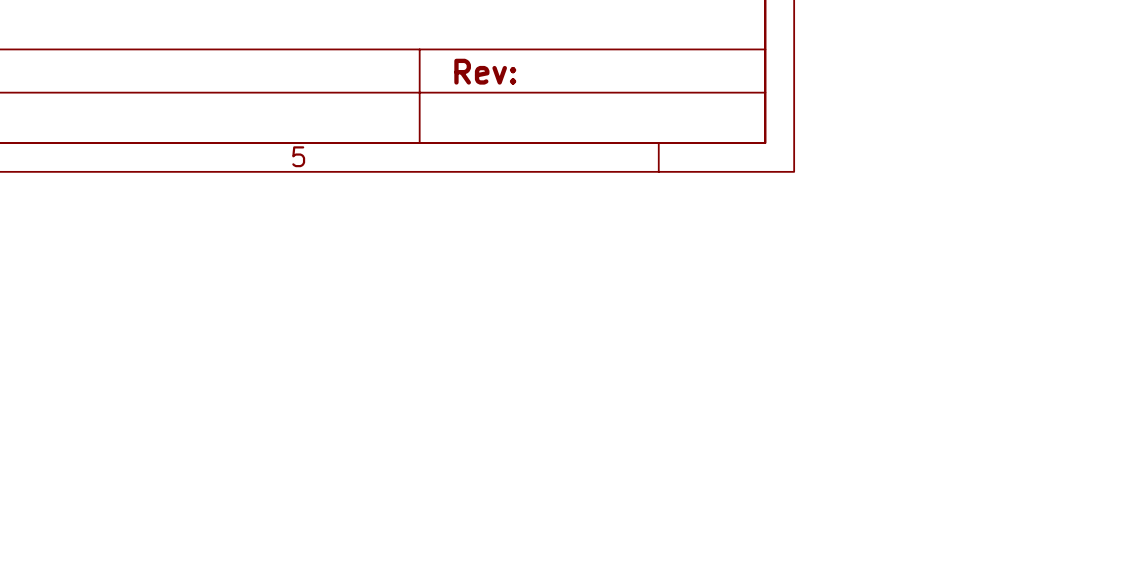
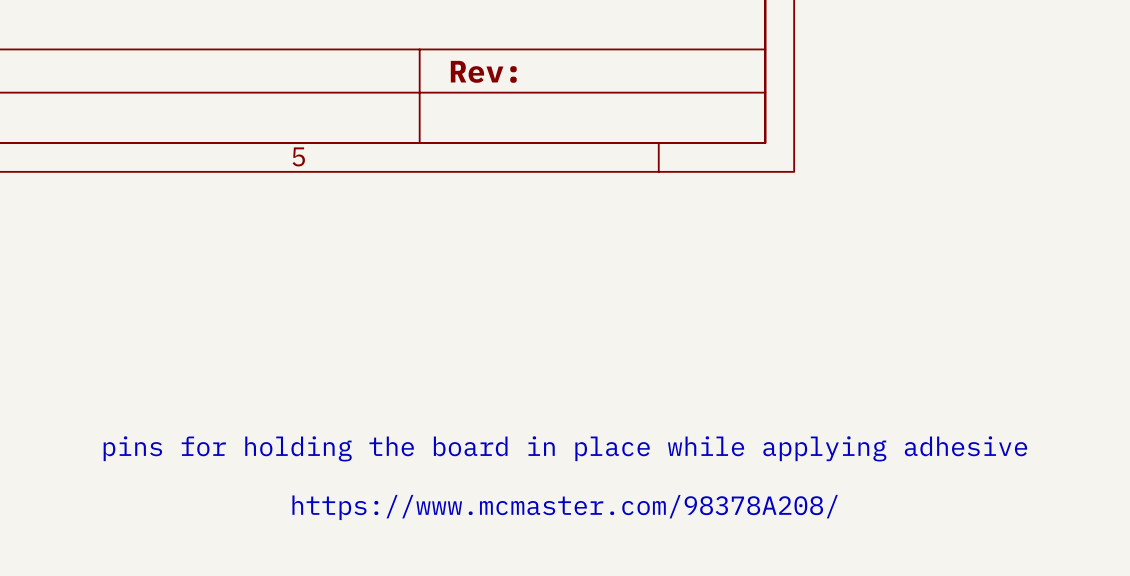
text: none -> pins for holding the board in place while applying adhesive (565, 448)
text: none -> https://www.mcmaster.com/98378A208/ (565, 507)

